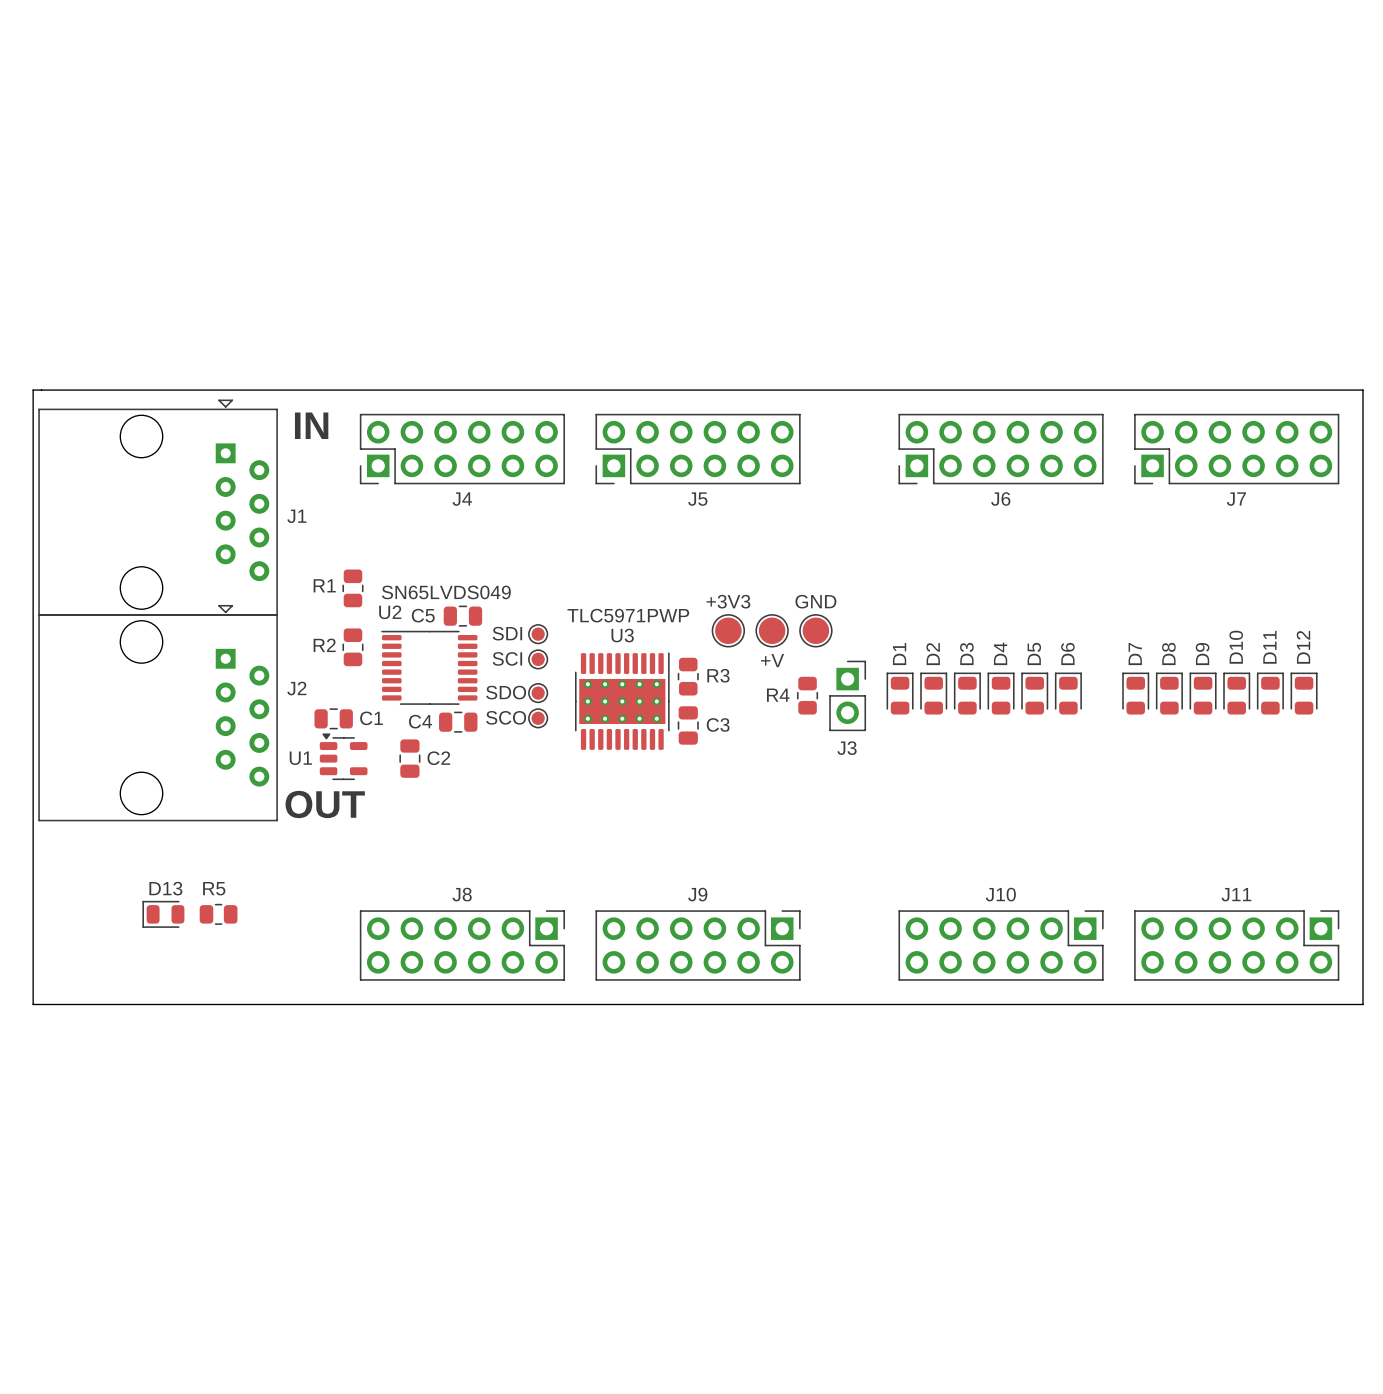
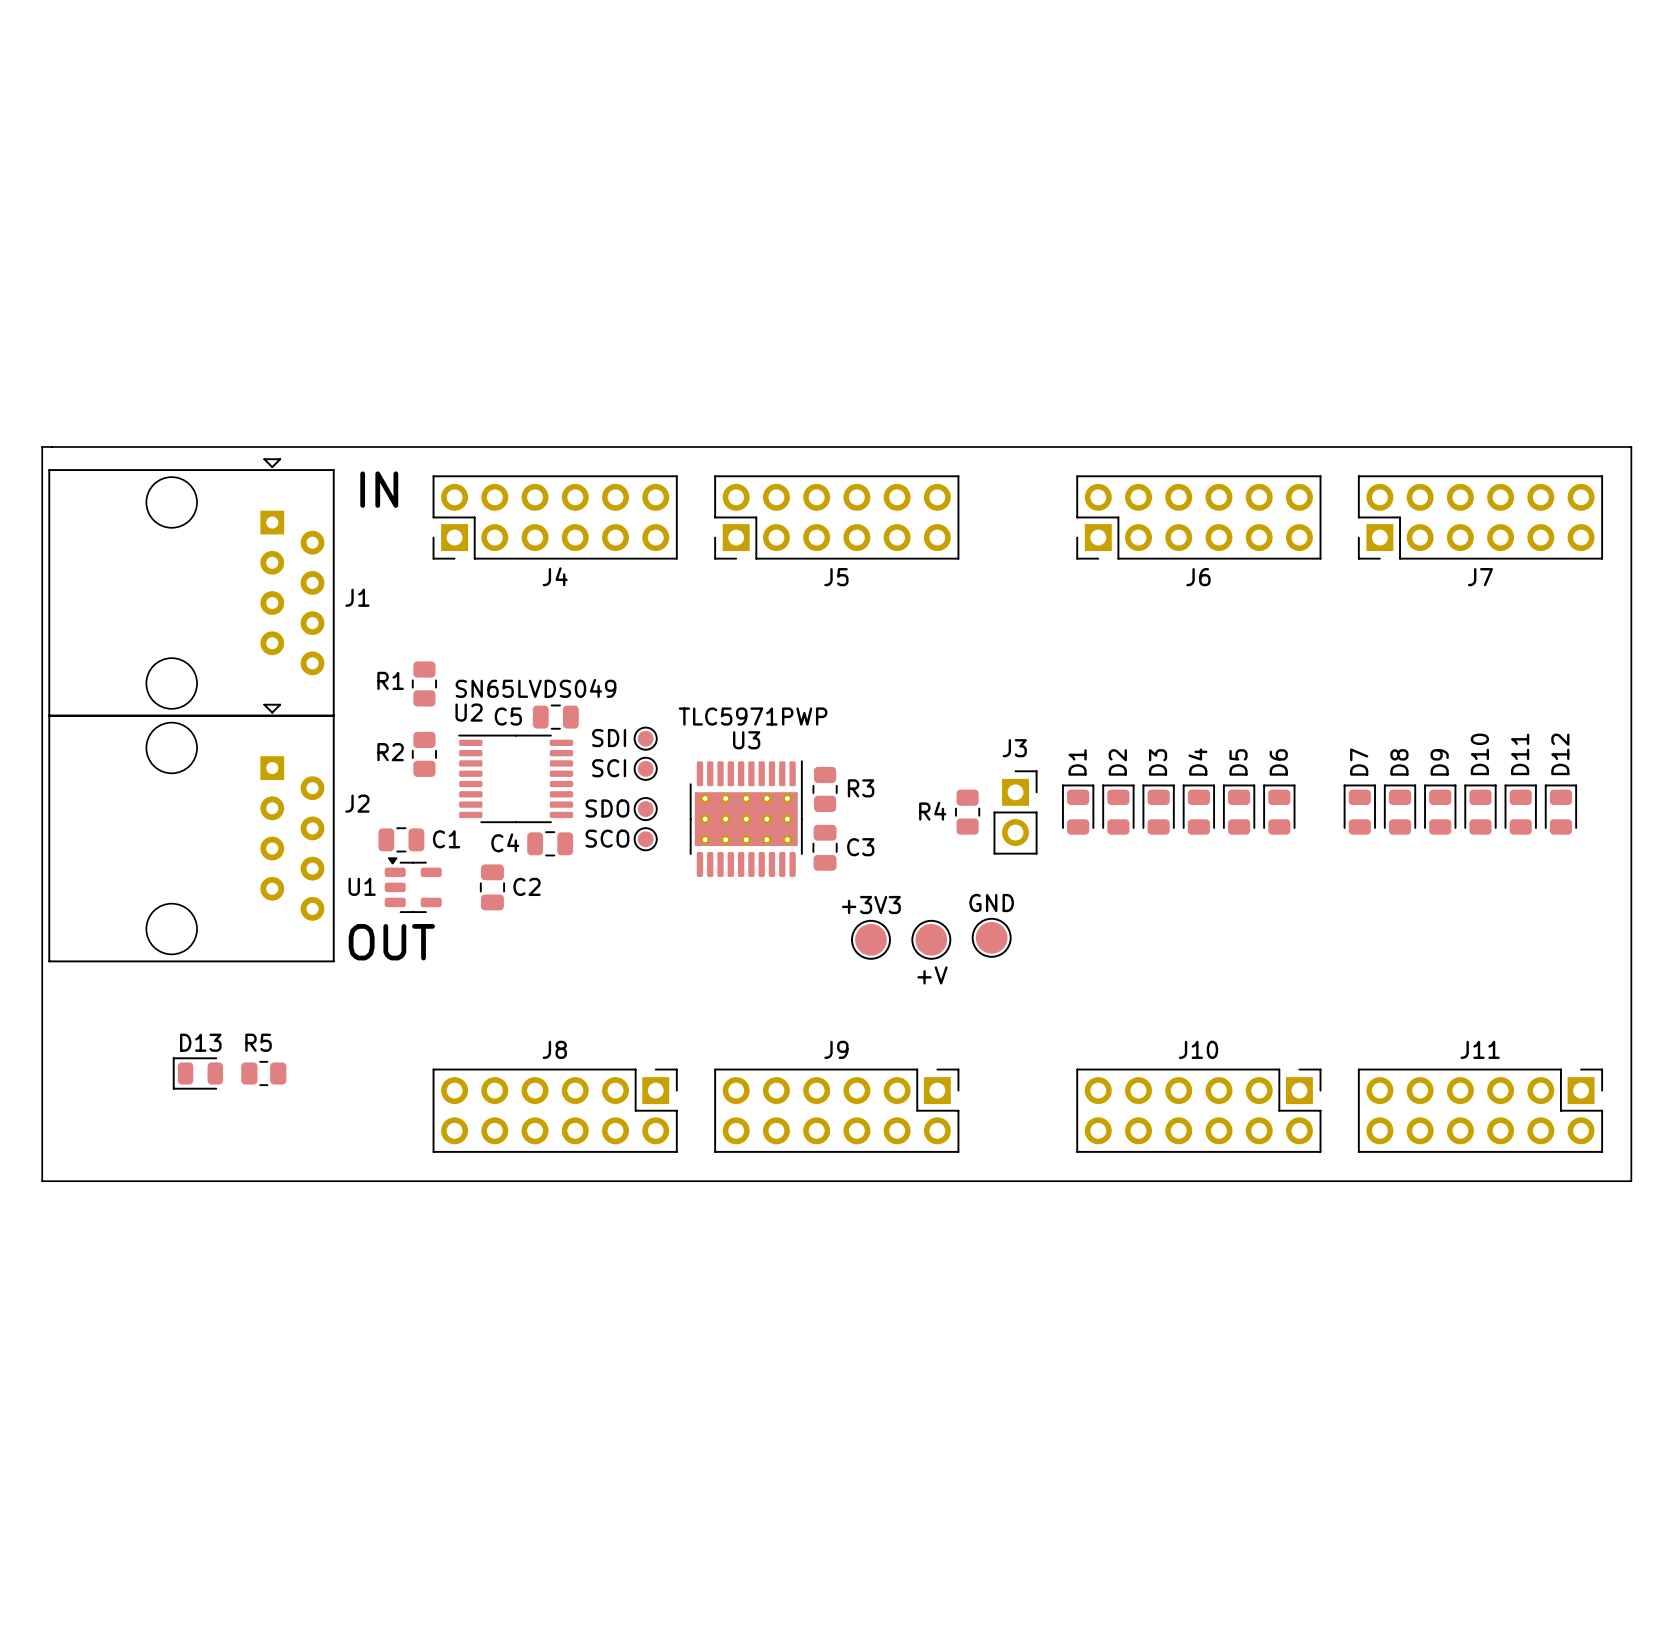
+3V3 position: (728, 630) -> (870, 939)
+V position: (772, 630) -> (931, 939)
GND position: (815, 630) -> (991, 937)
J3 name position: J3 (847, 748) -> J3 (1014, 748)

